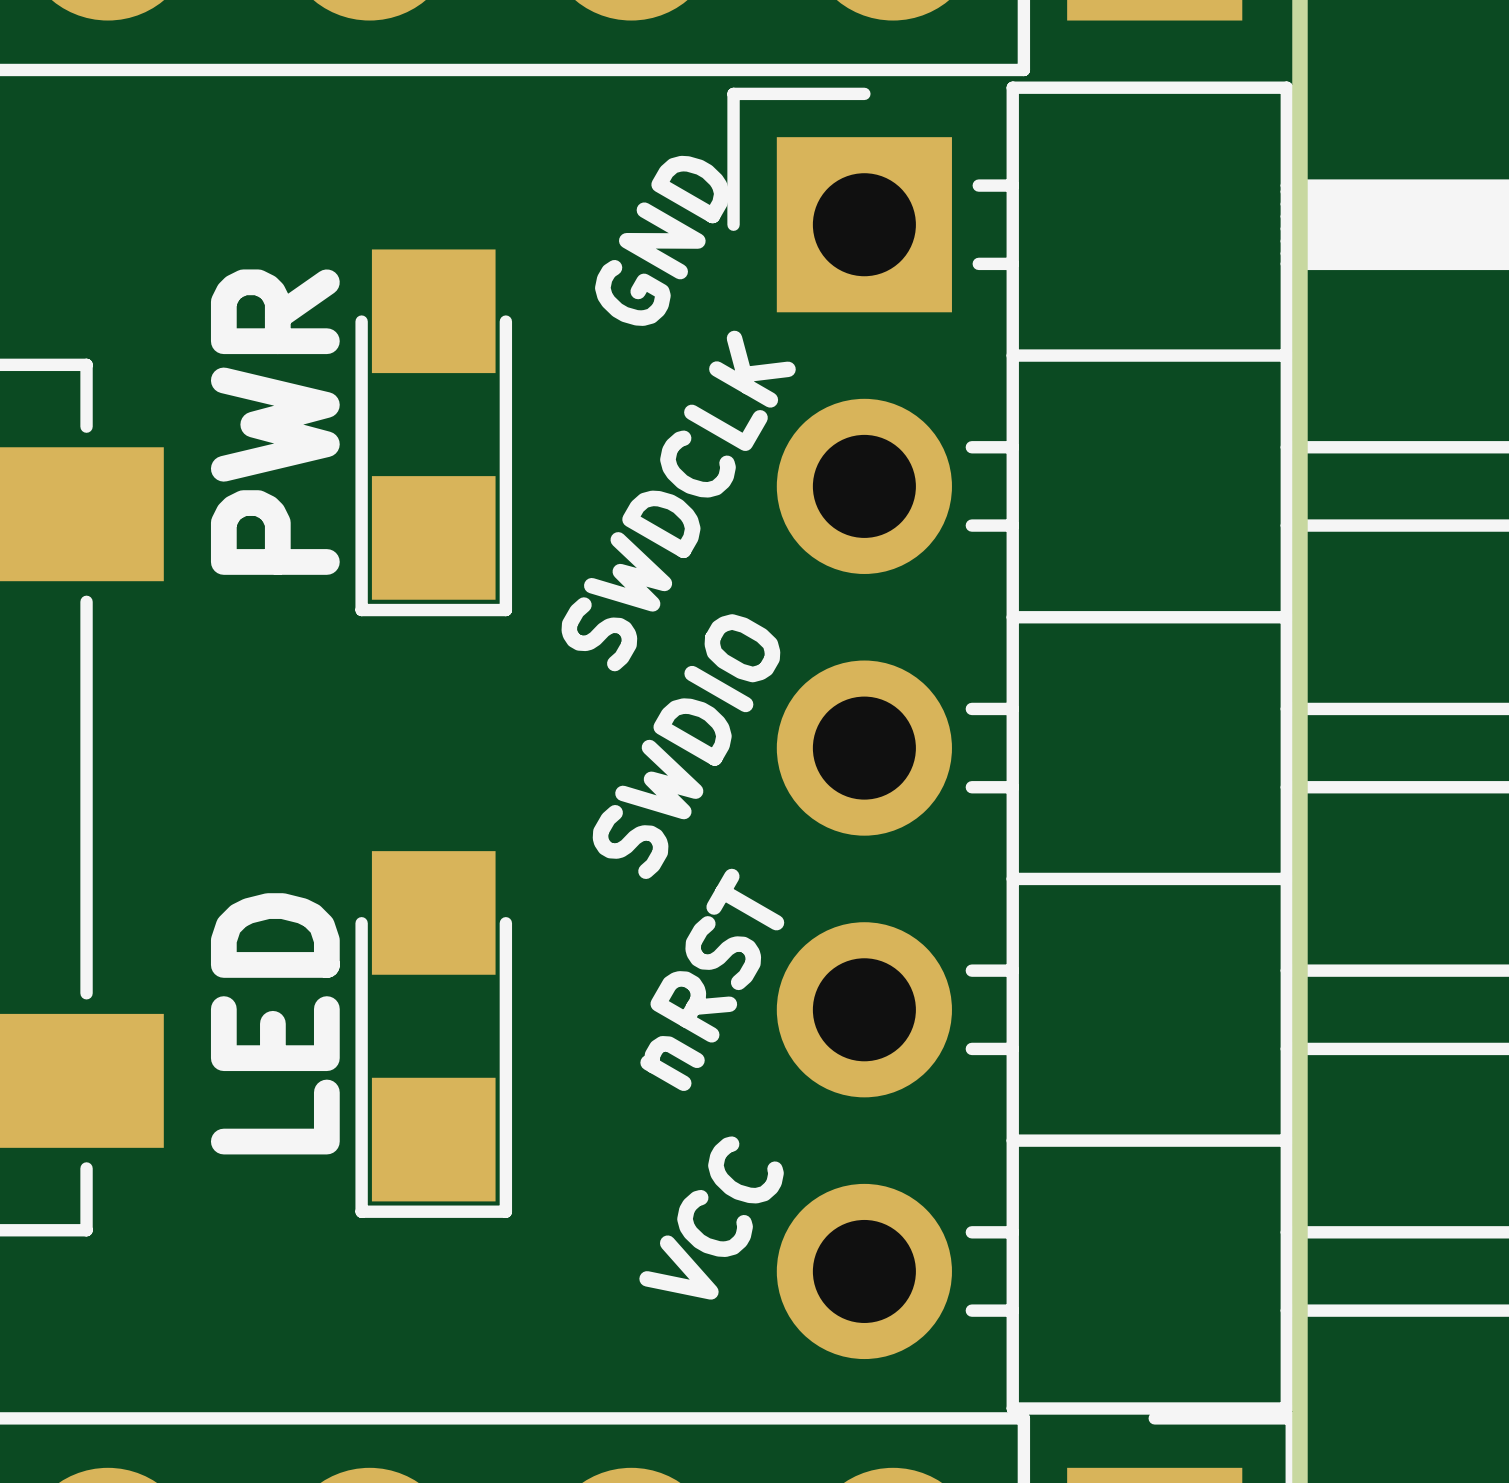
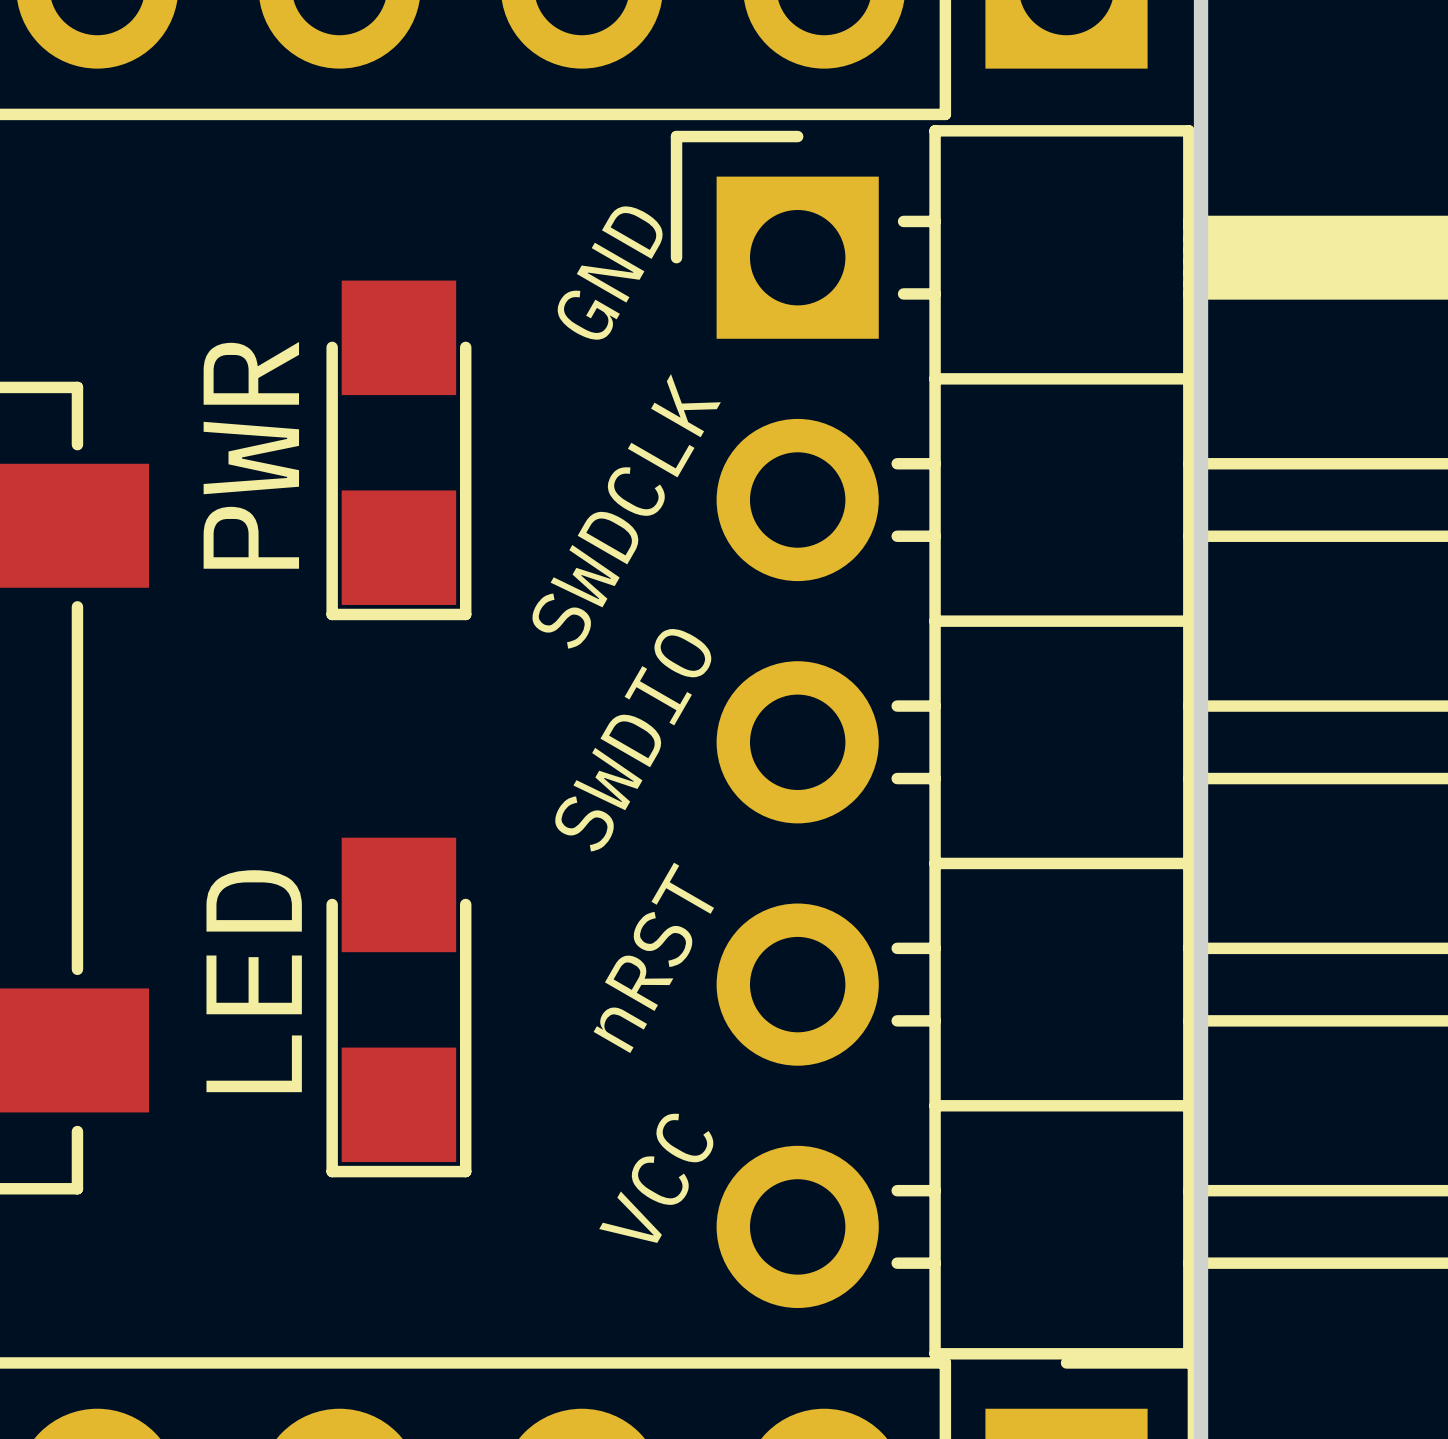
PWR name position: PWR (275, 422) -> PWR (251, 455)
LED name position: LED (275, 1023) -> LED (254, 981)

